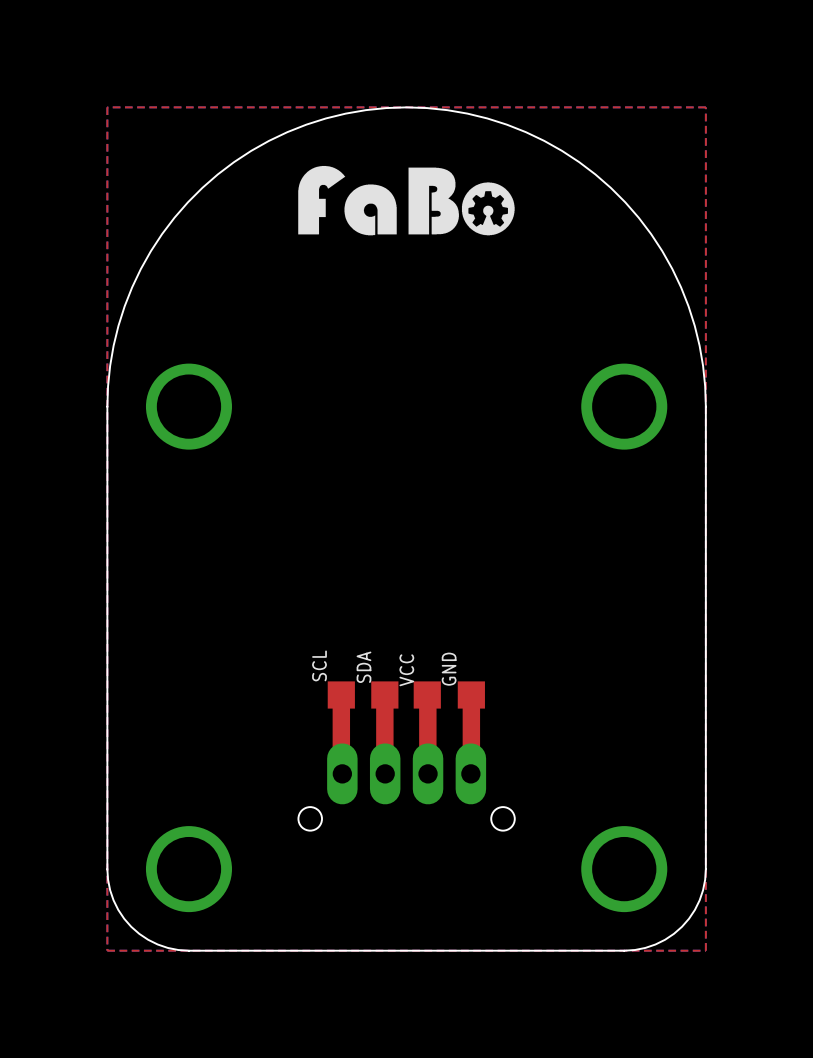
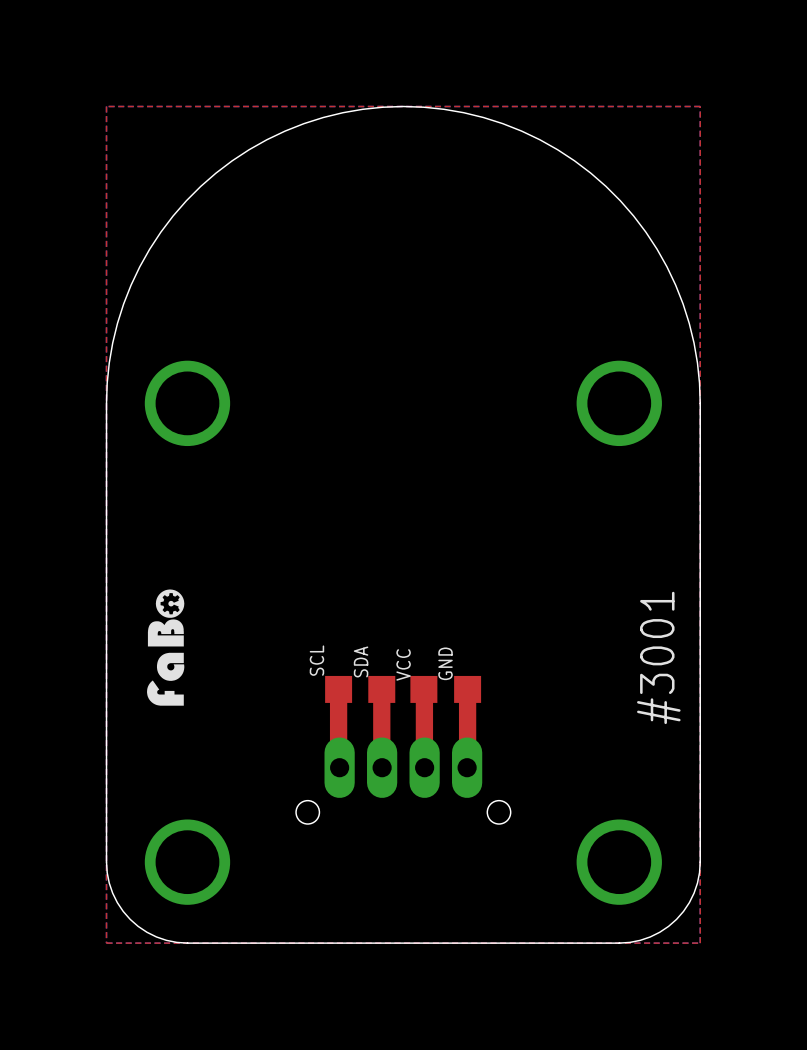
drawing: [298, 165, 515, 236] -> none
drawing: none -> [147, 589, 185, 706]
text: none -> #3001 (658, 657)

